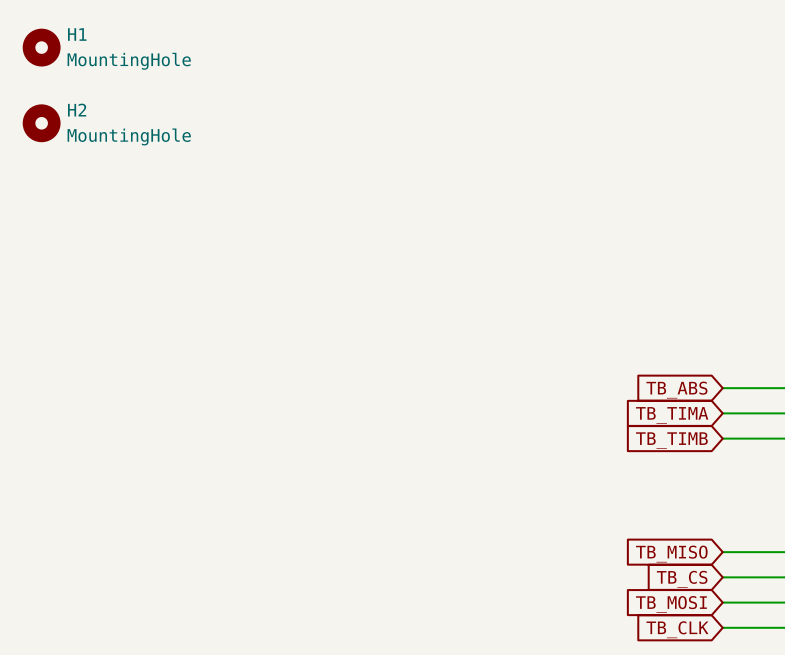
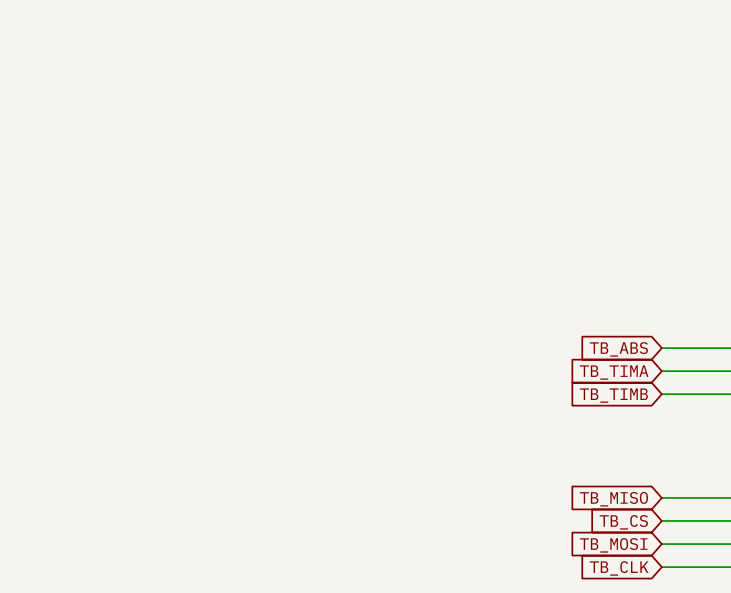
H1: MountingHole (41, 47) -> none
H2: MountingHole (41, 123) -> none

